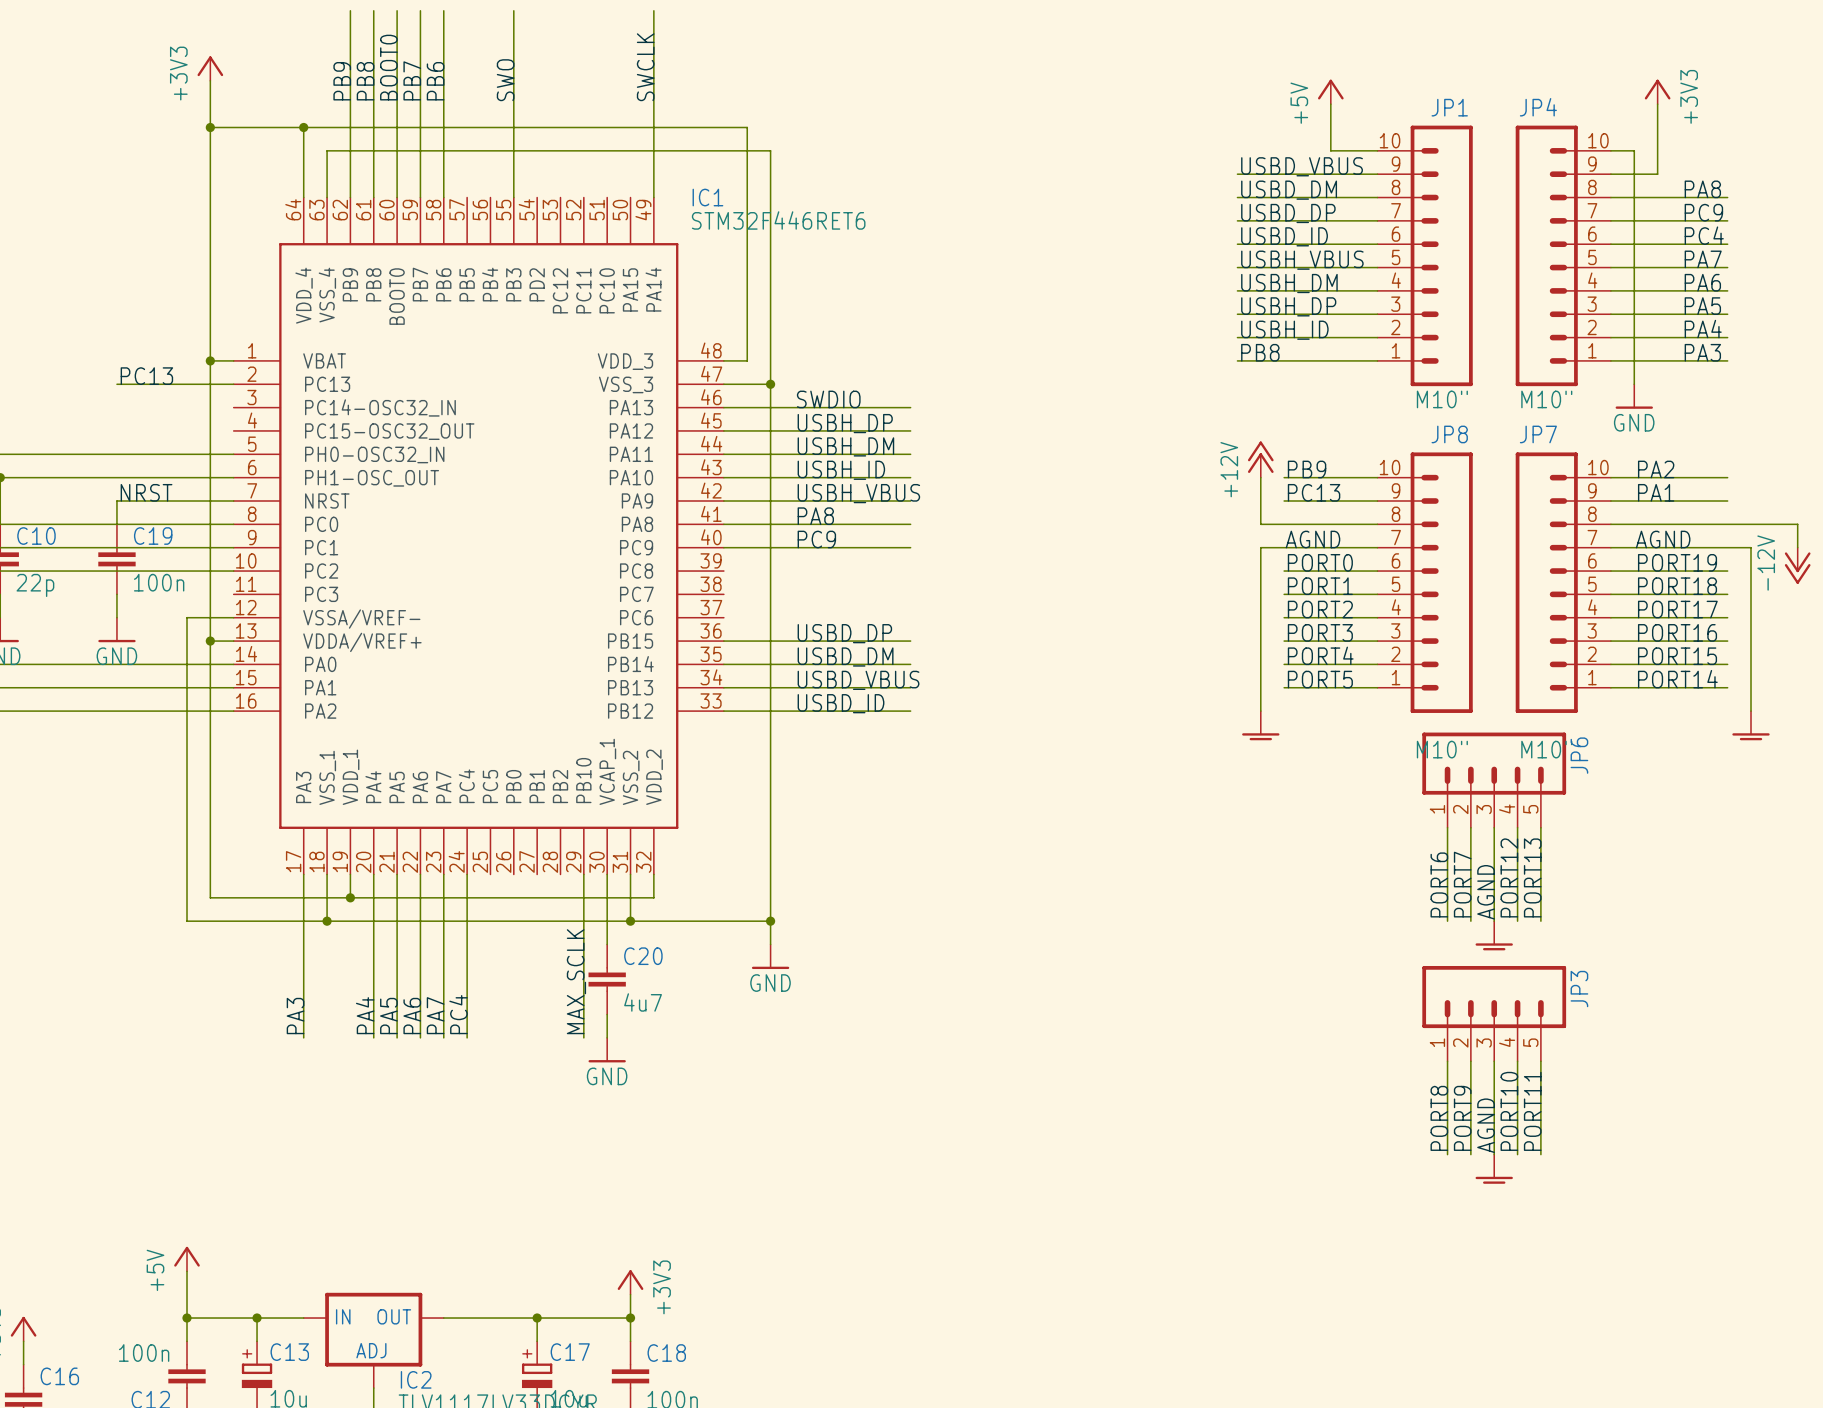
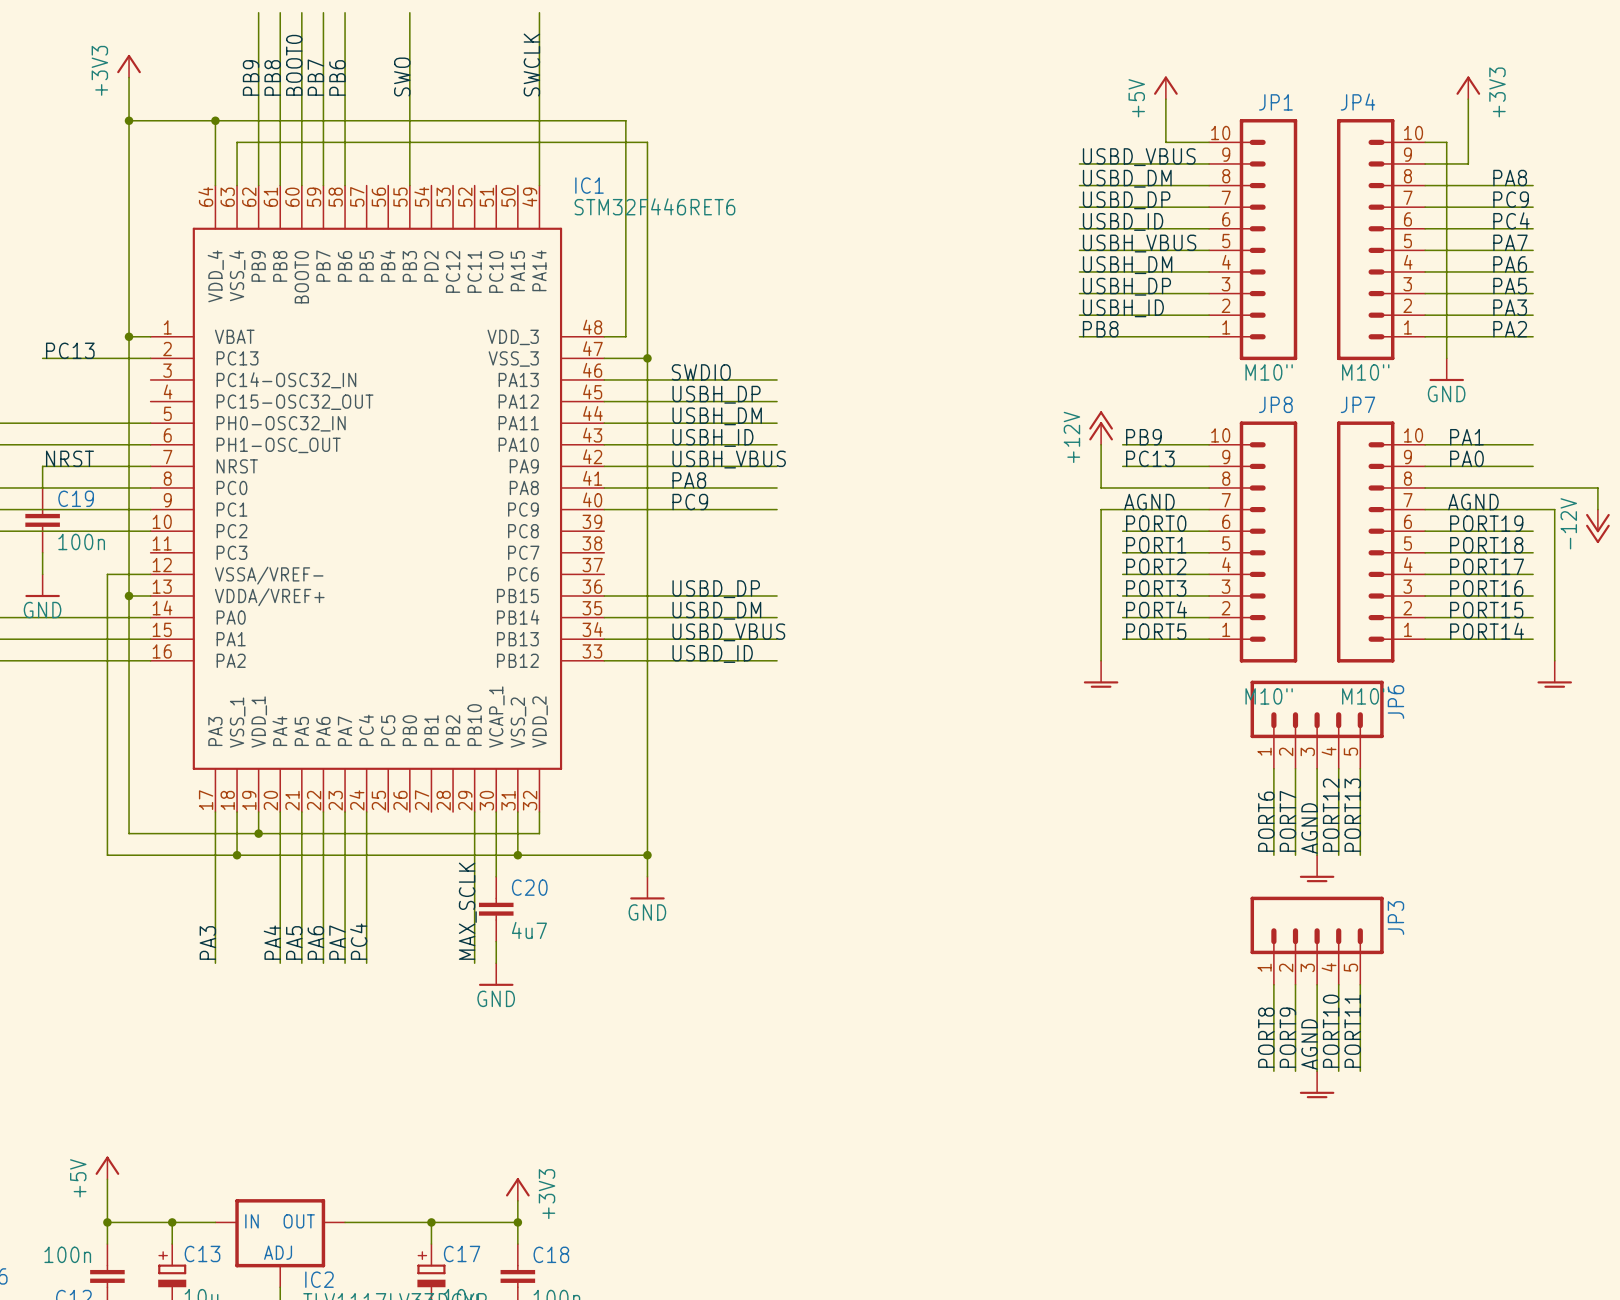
label: PA4 (1703, 329) -> PA3 (1510, 307)
label: PA3 (1702, 352) -> PA2 (1510, 329)
label: PA2 (1656, 469) -> PA1 (1466, 437)
label: PA1 (1656, 492) -> PA0 (1466, 458)

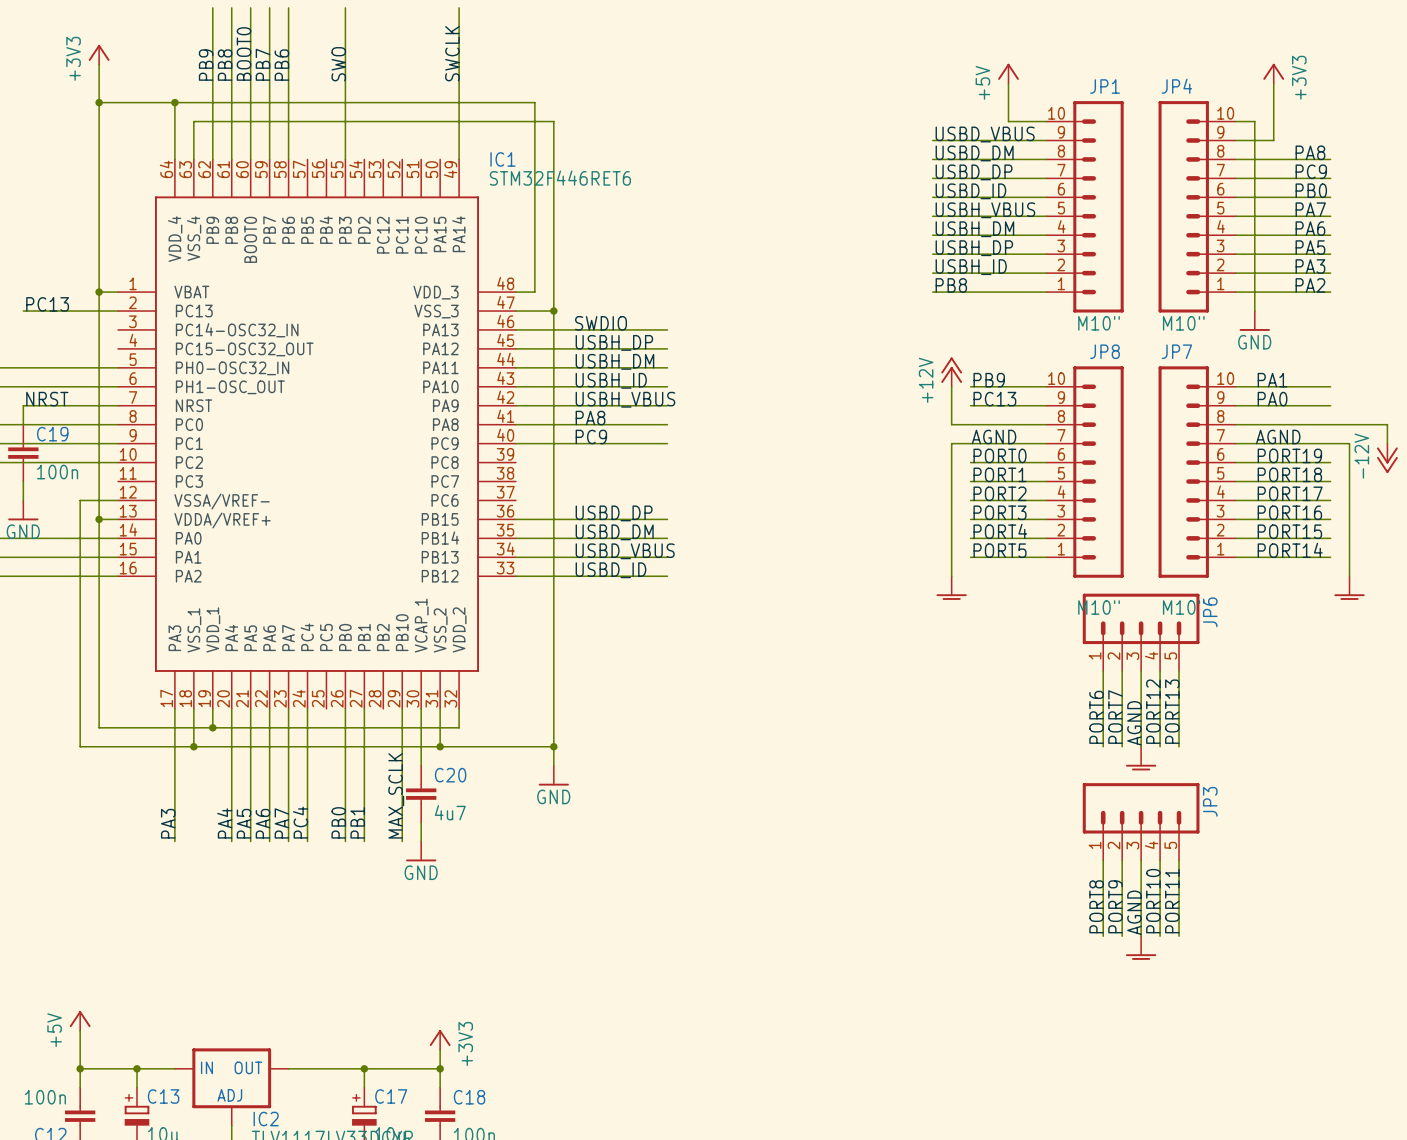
label: PC4 (1511, 220) -> PB0 (1311, 190)
wire: none -> (345, 708) (345, 841)
wire: none -> (364, 708) (364, 841)
label: none -> PB0 (338, 822)
label: none -> PB1 (357, 822)

